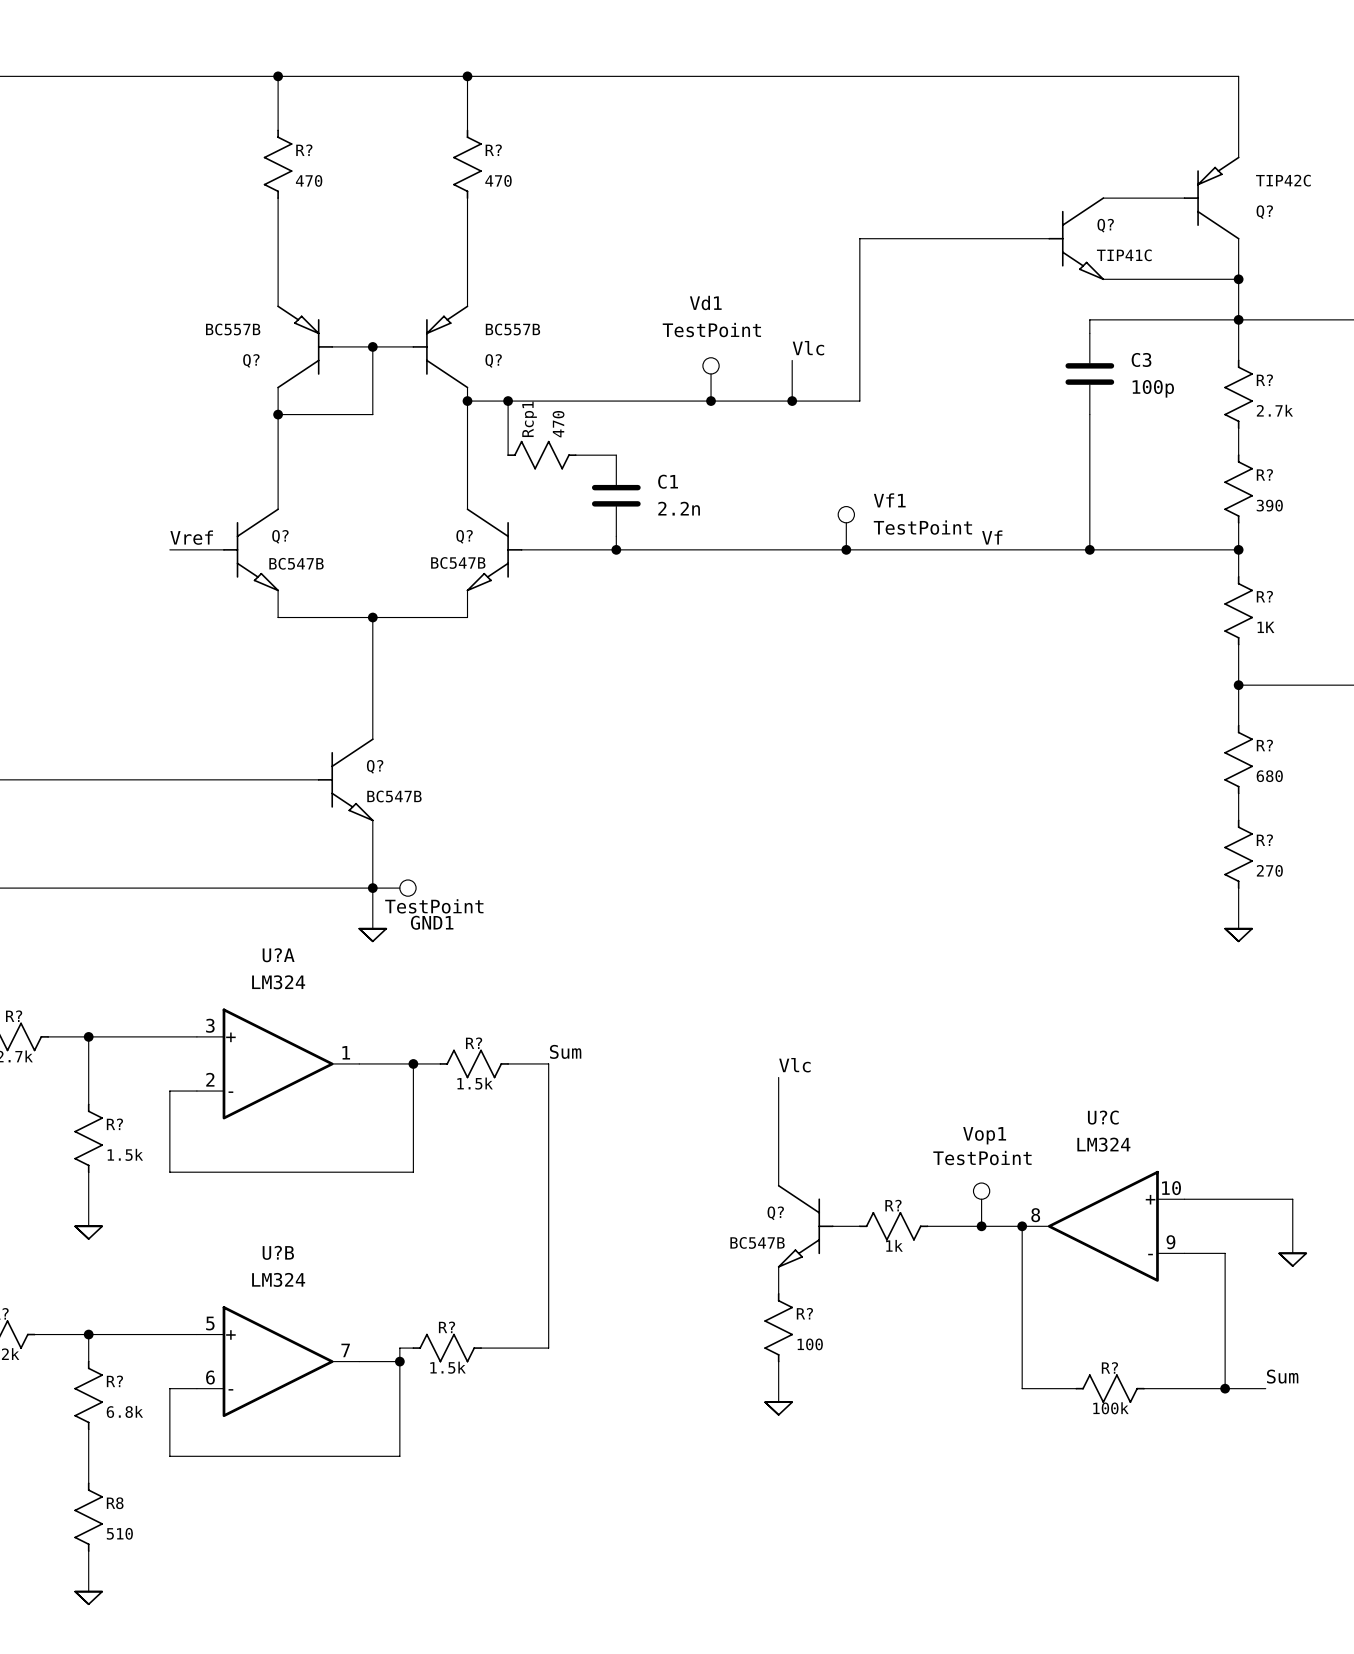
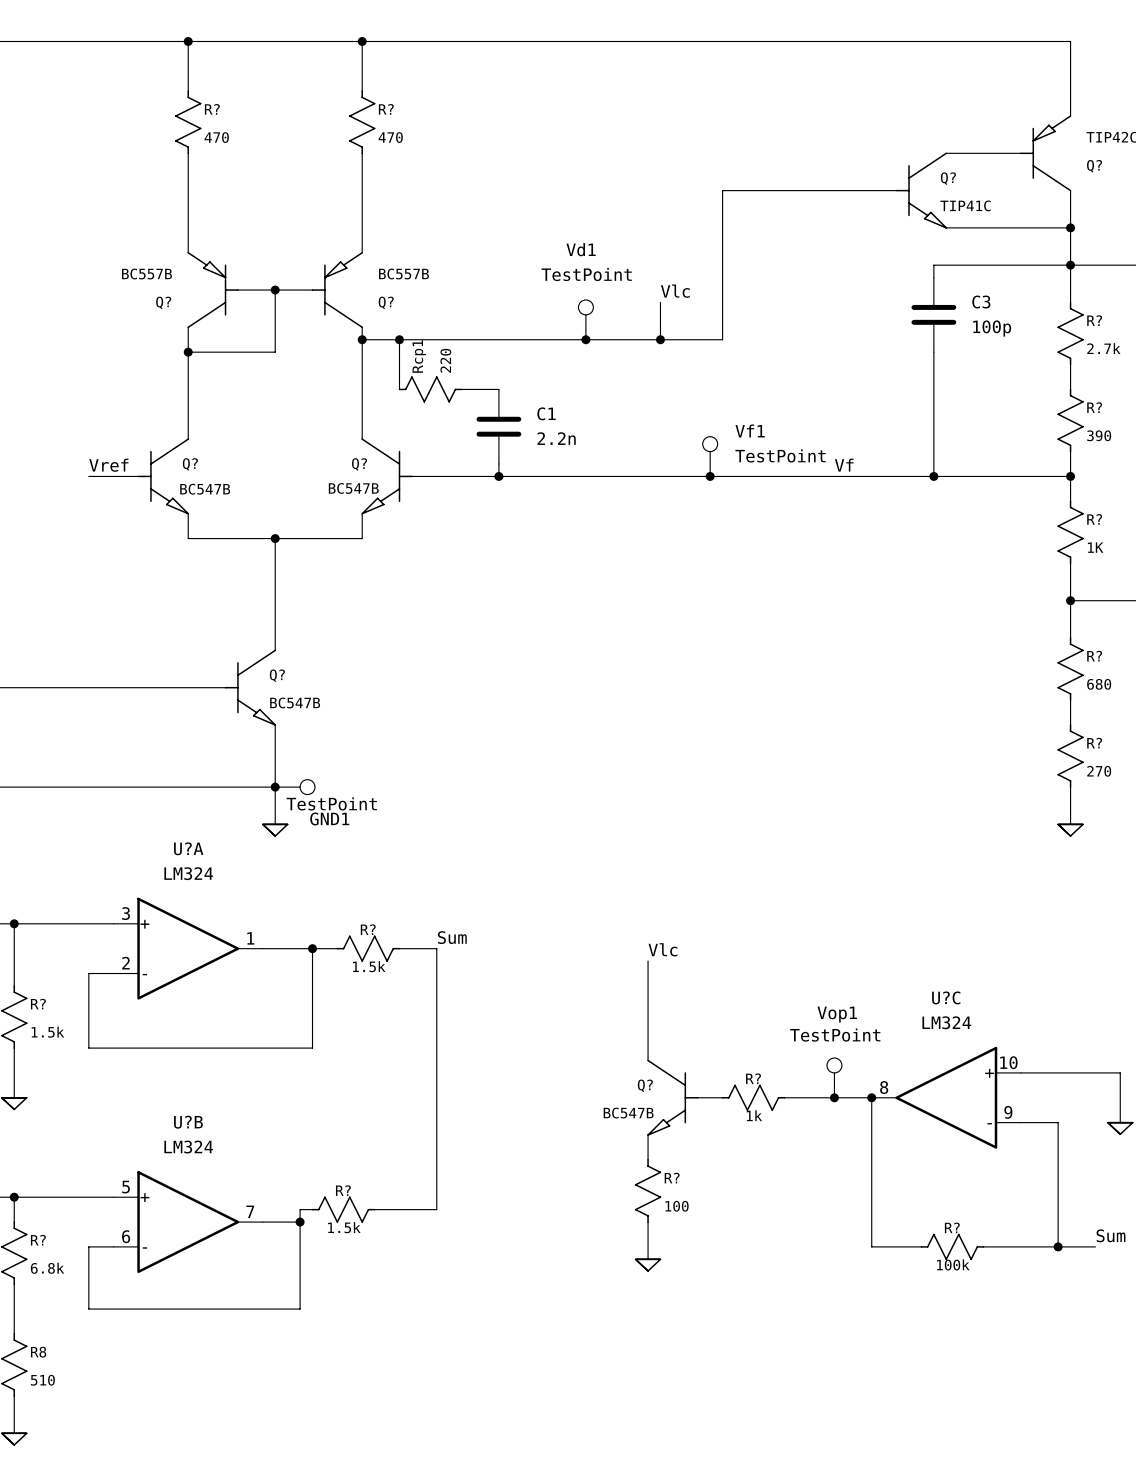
Rcp1 value: 470 (558, 424) -> 220 (445, 360)

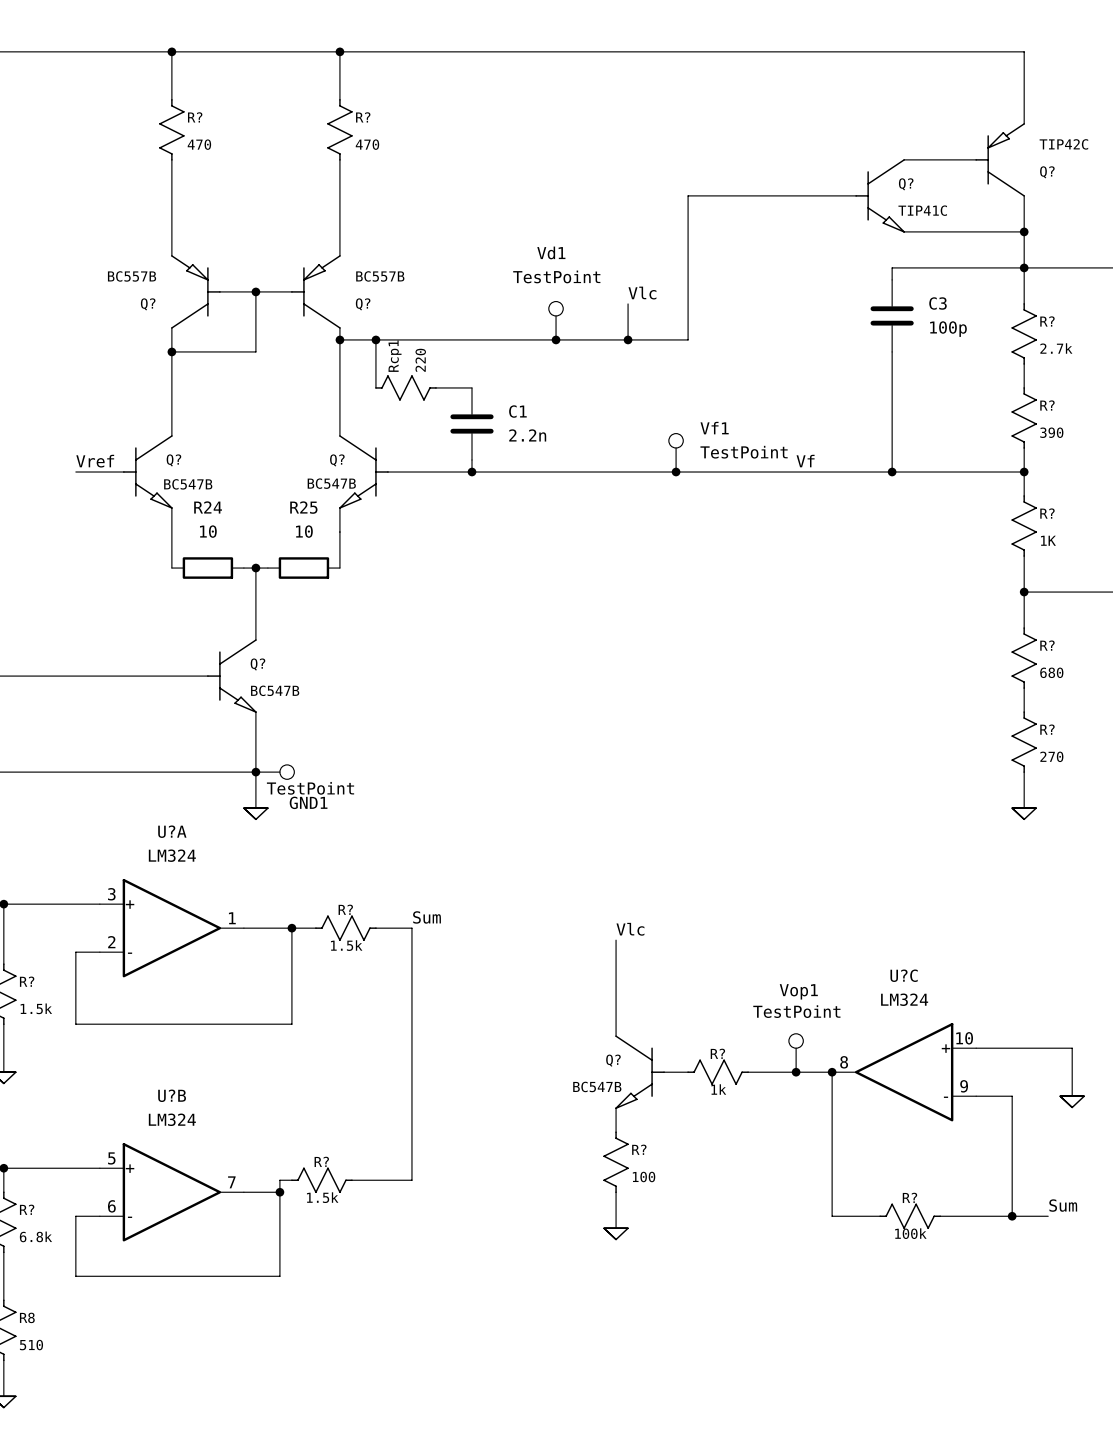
wire: (188, 538) (362, 538) -> (171, 532) (171, 568)
wire: (275, 538) (275, 575) -> (339, 532) (339, 568)
junction position: (275, 538) -> (255, 568)
R24: none -> 10 (207, 568)
wire: none -> (243, 568) (267, 568)
R25: none -> 10 (303, 568)

